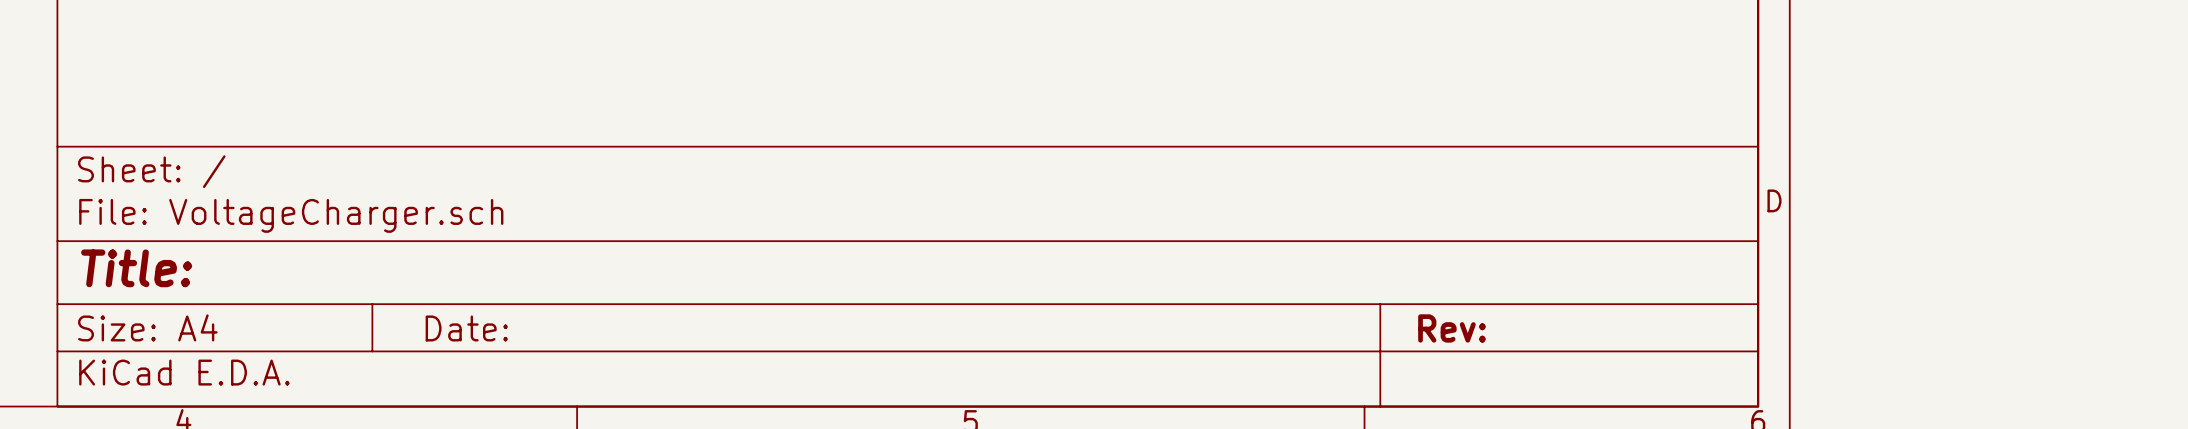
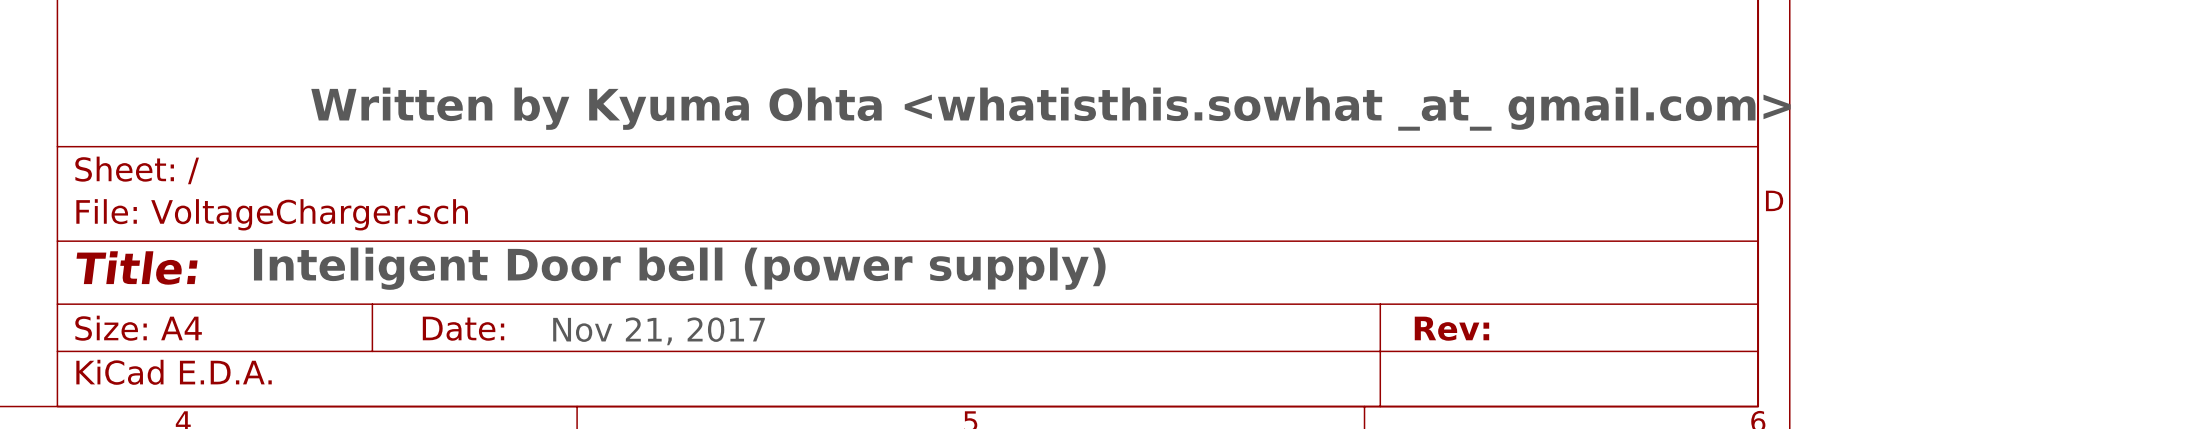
text: none -> Written by Kyuma Ohta <whatisthis.sowhat _at_ gmail.com> (1050, 109)
text: none -> Inteligent Door bell (power supply) (679, 268)
text: none -> Nov 21, 2017 (659, 331)

